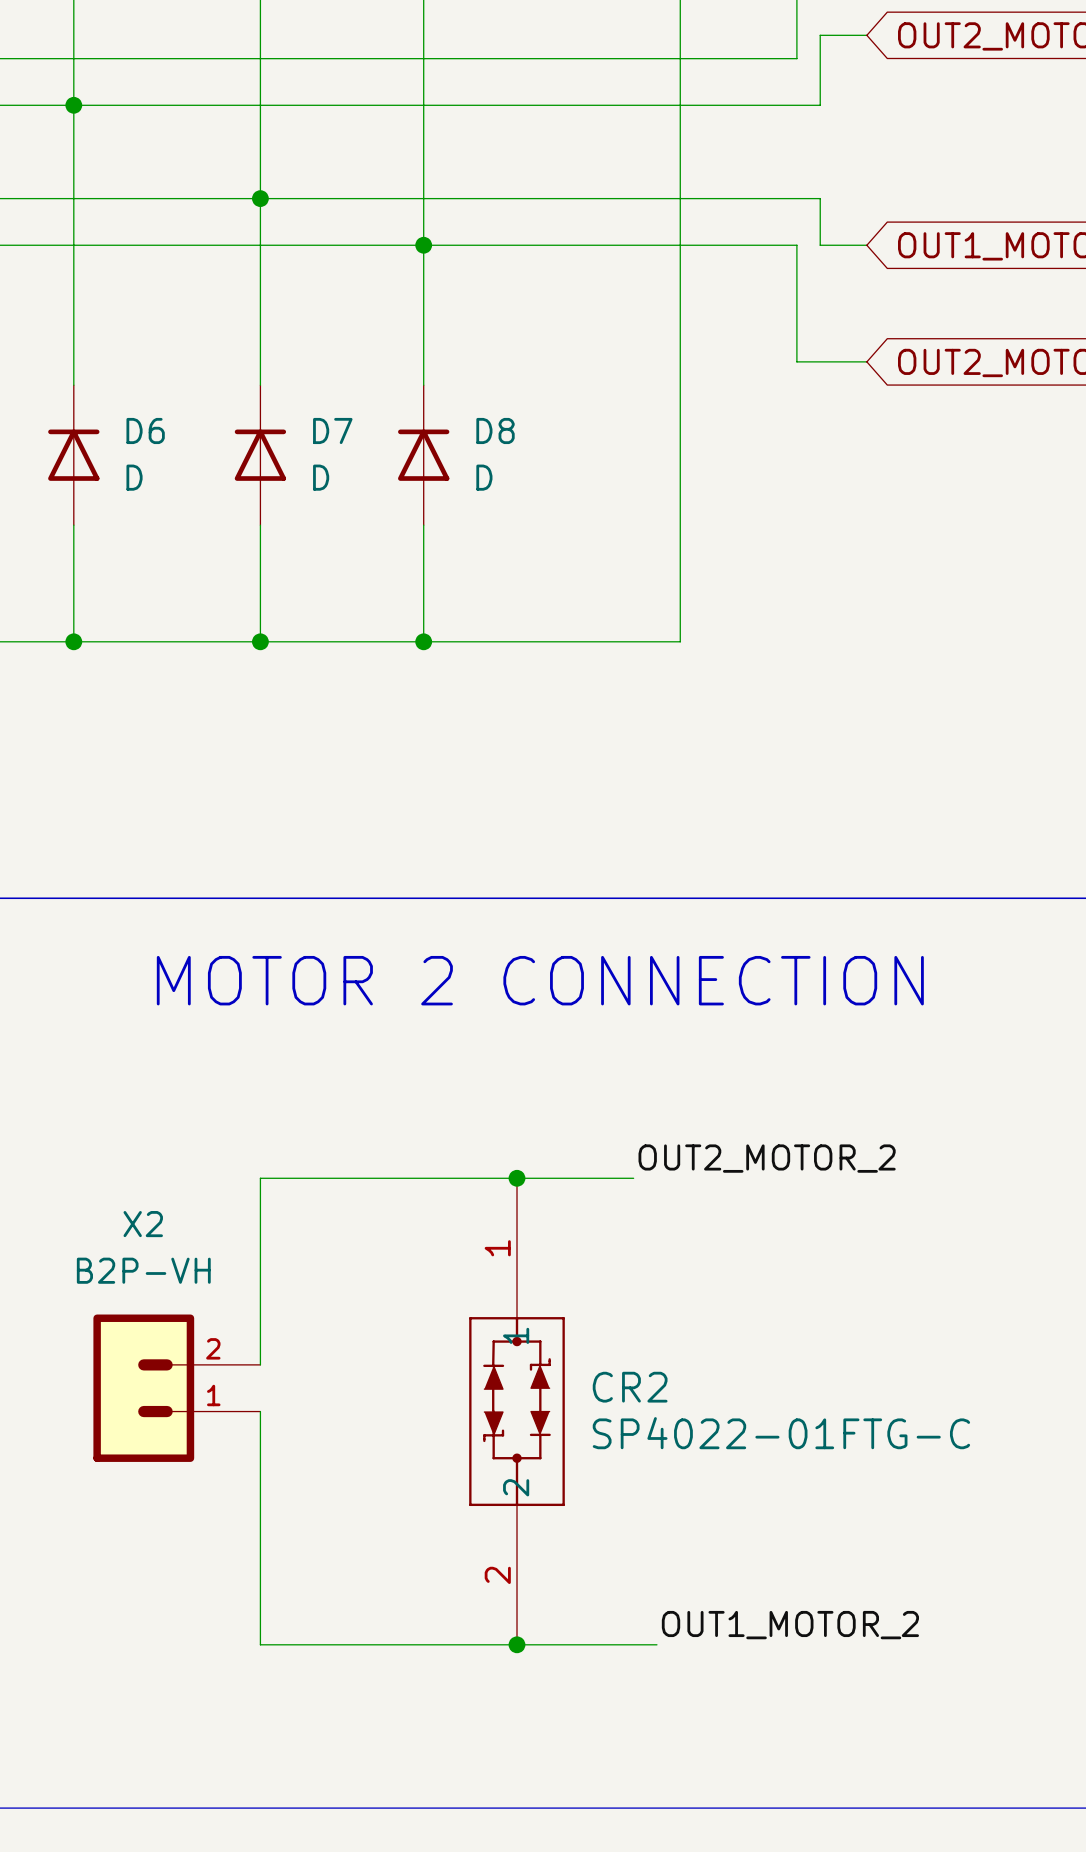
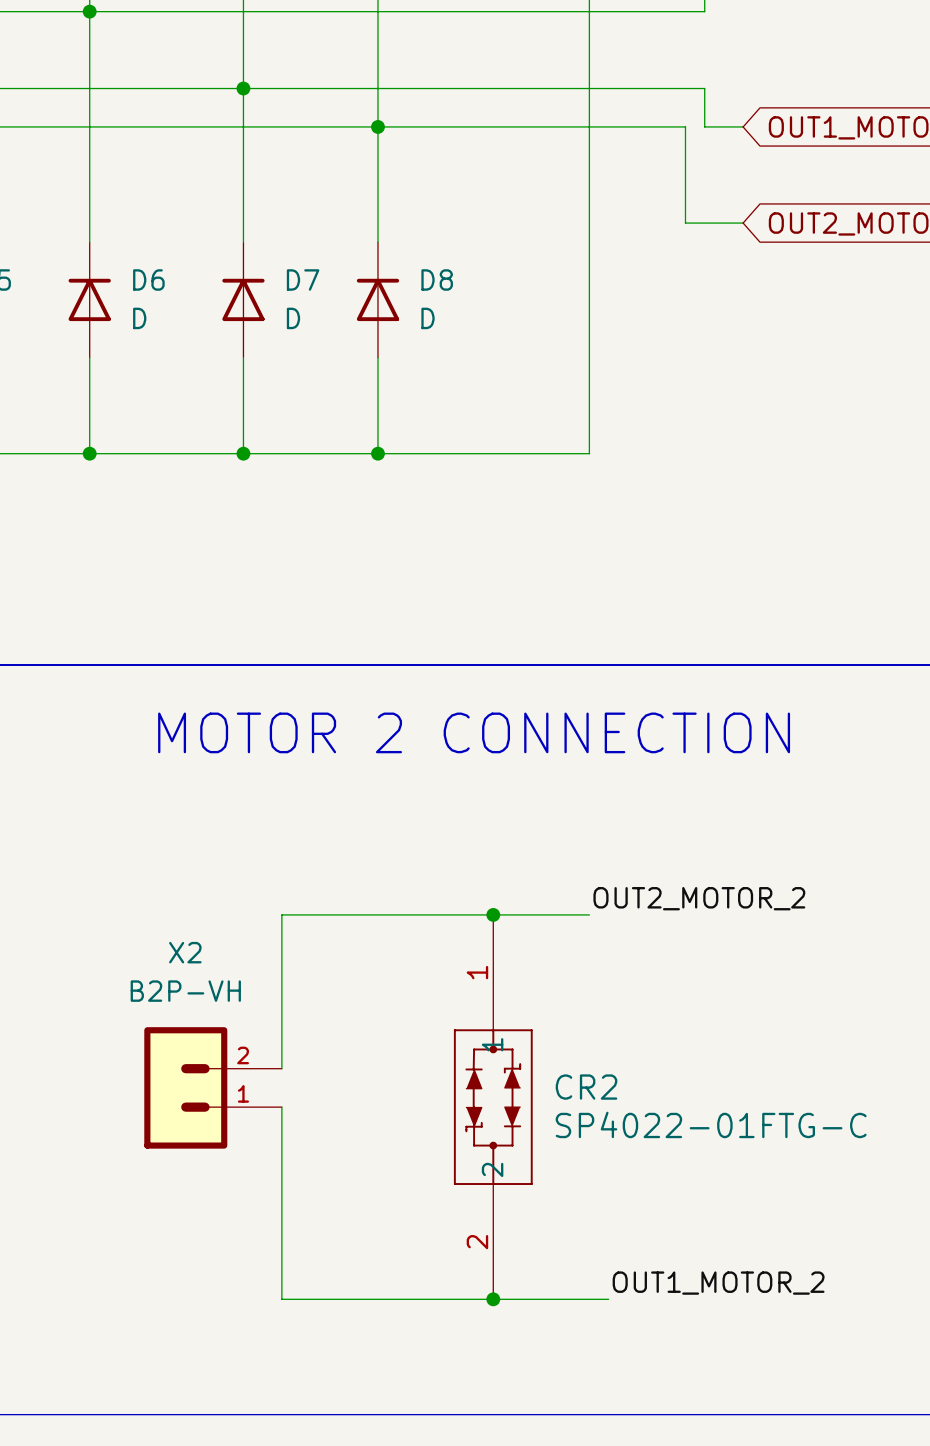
label position: OUT2_MOTOR_2 (767, 1158) -> OUT2_MOTOR_2 (699, 898)
junction position: (517, 1178) -> (493, 914)
wire: (633, 1178) (260, 1178) (260, 1364) -> (589, 914) (281, 914) (281, 1068)
X2 position: (176, 1388) -> (213, 1087)
wire: (260, 1411) (260, 1644) (656, 1644) -> (281, 1107) (281, 1299) (608, 1299)
CR2 position: (517, 1411) -> (493, 1107)
label position: OUT1_MOTOR_2 (790, 1625) -> OUT1_MOTOR_2 (718, 1283)
junction position: (517, 1644) -> (493, 1299)

